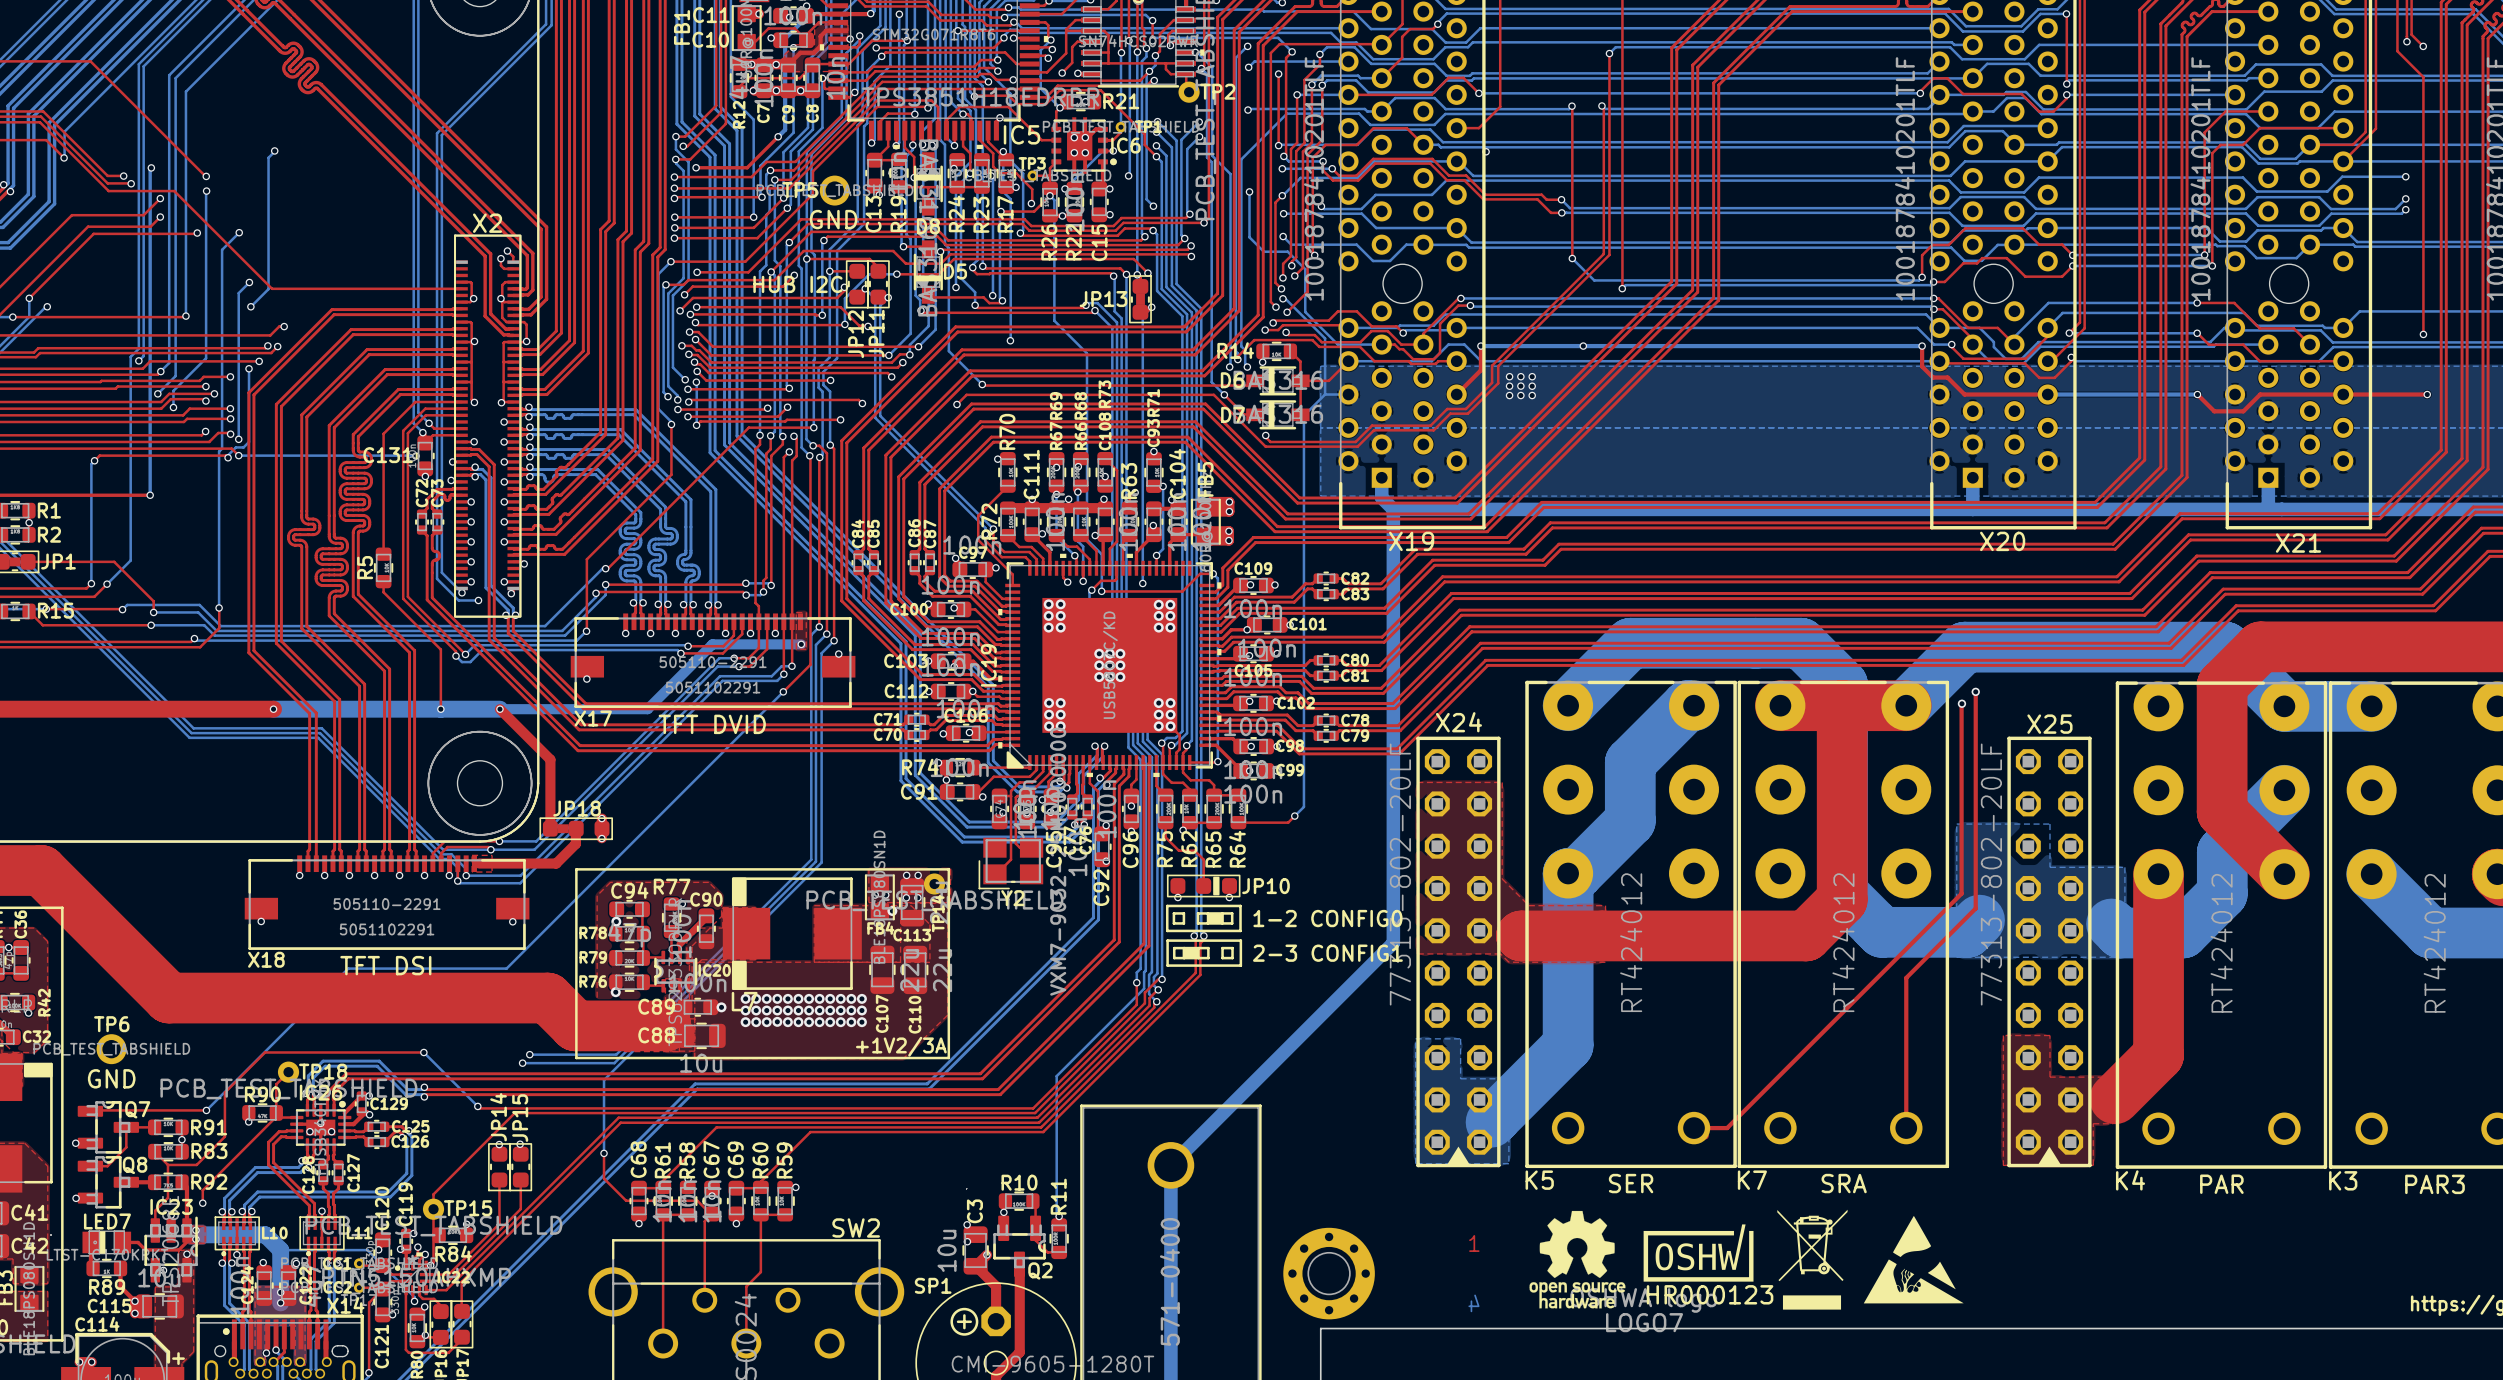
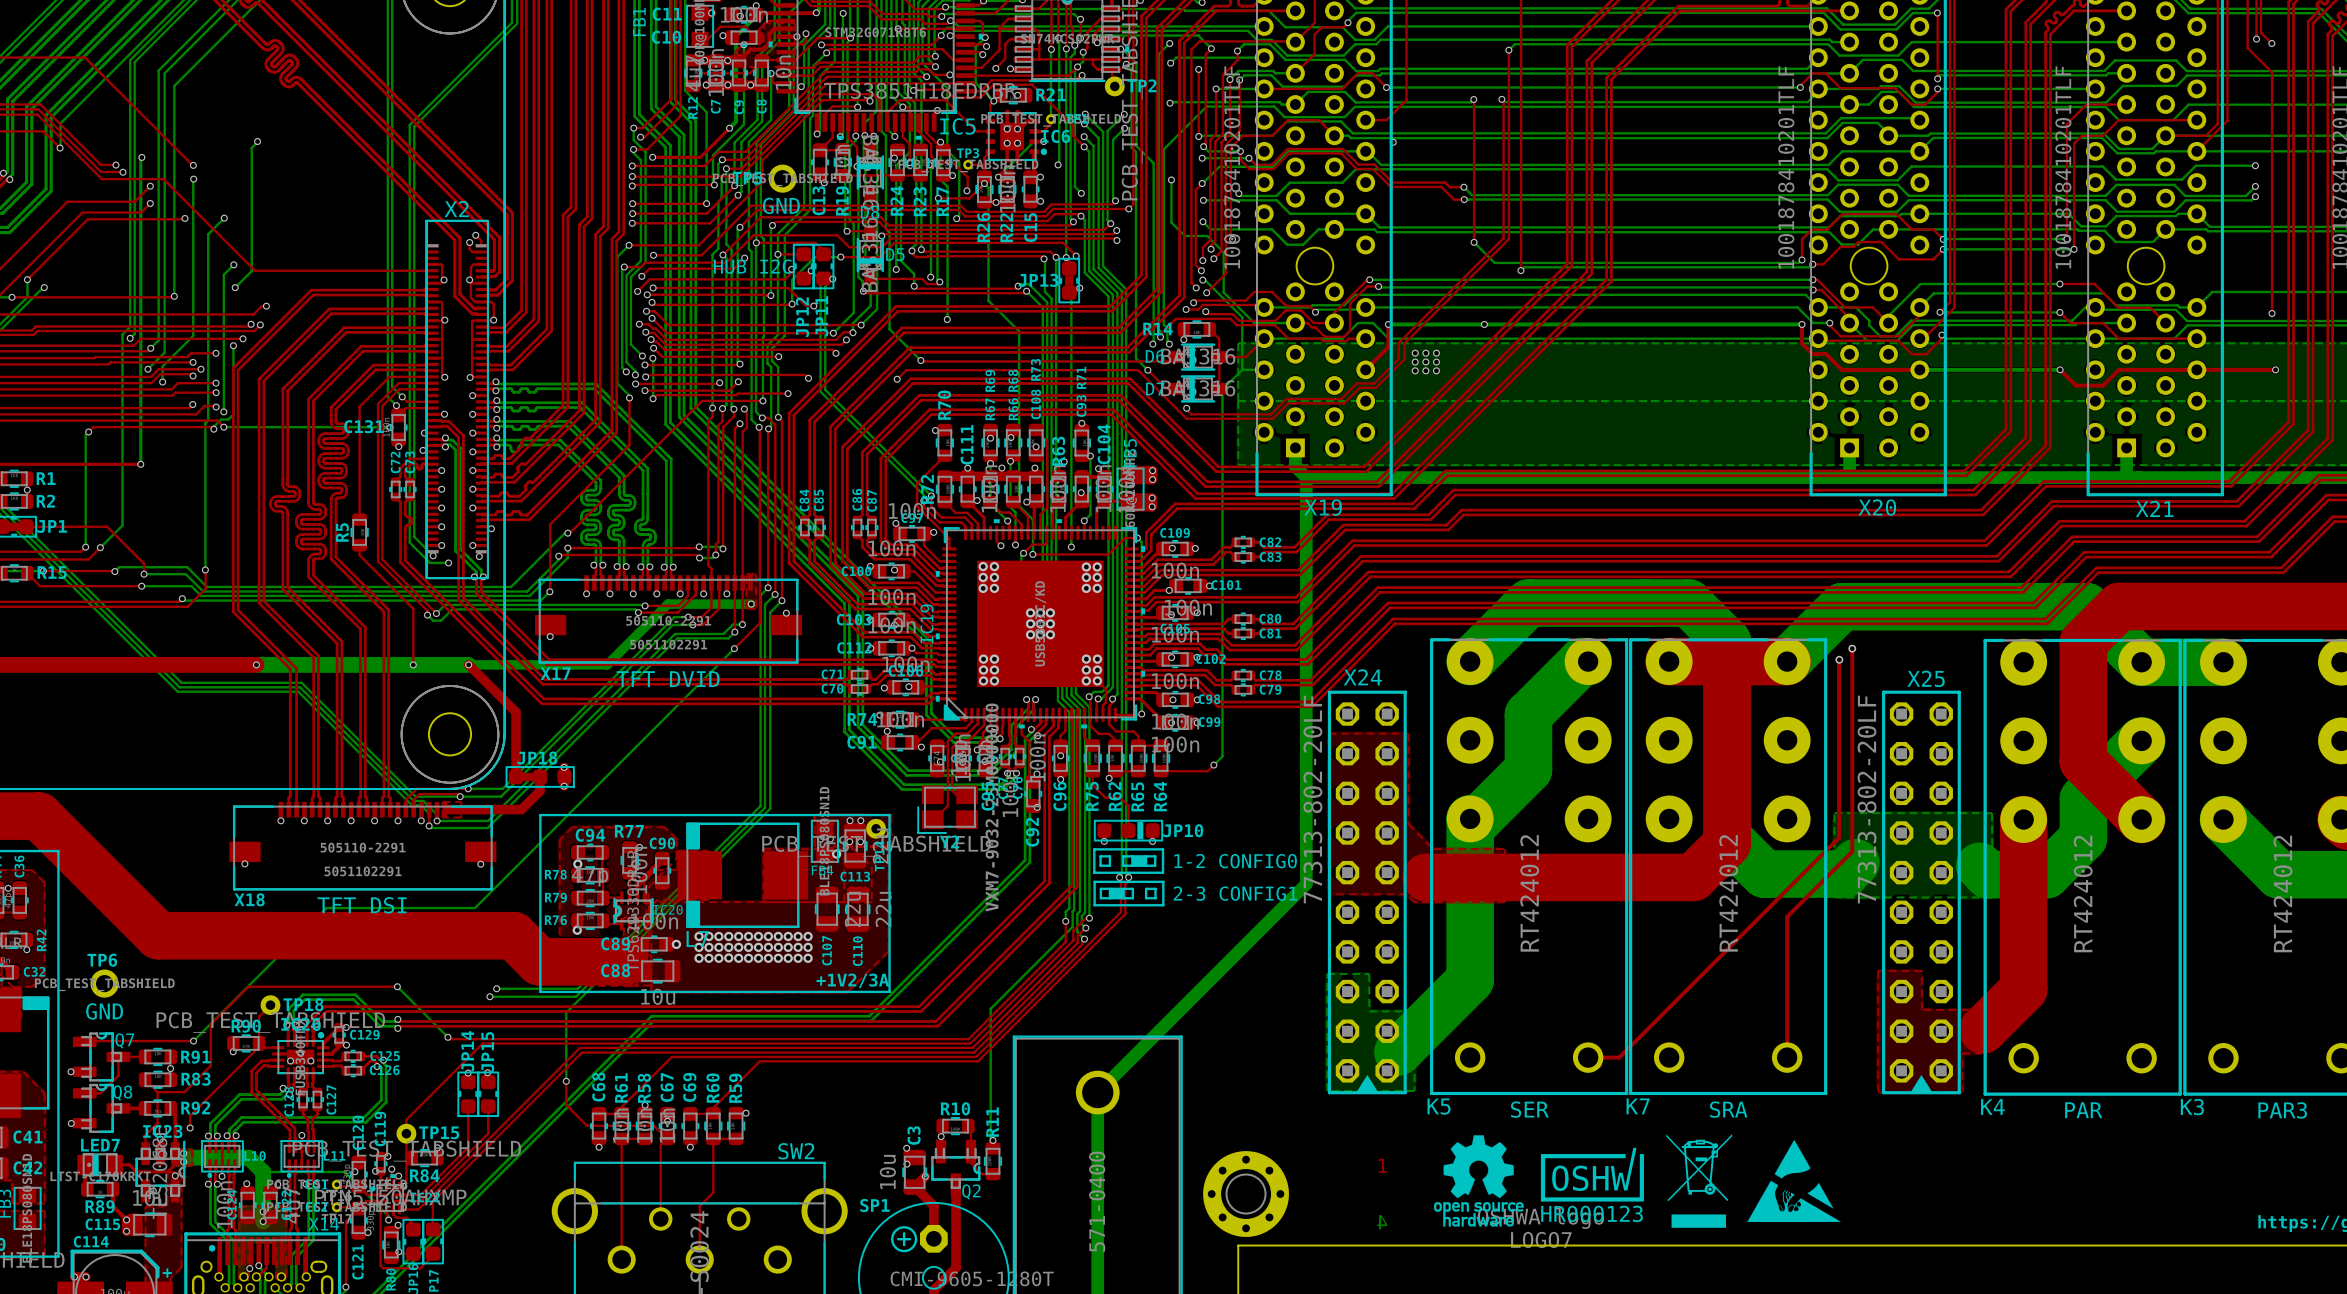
bottom zone outline: (1956, 867) (1956, 824) (2049, 824) (2049, 867) -> (1834, 813) (1921, 813)

